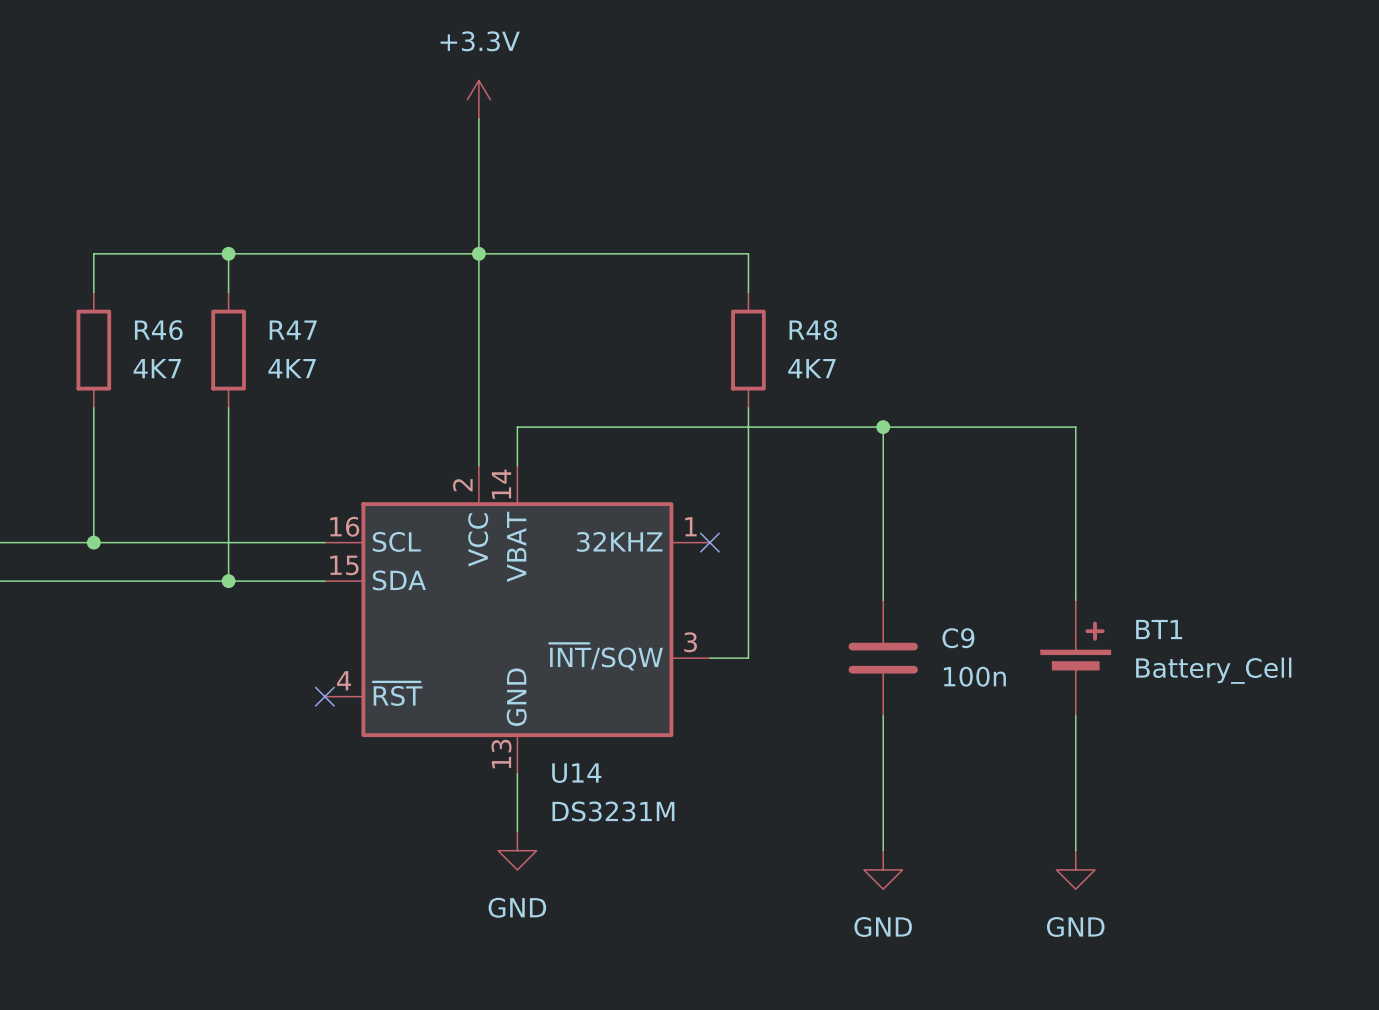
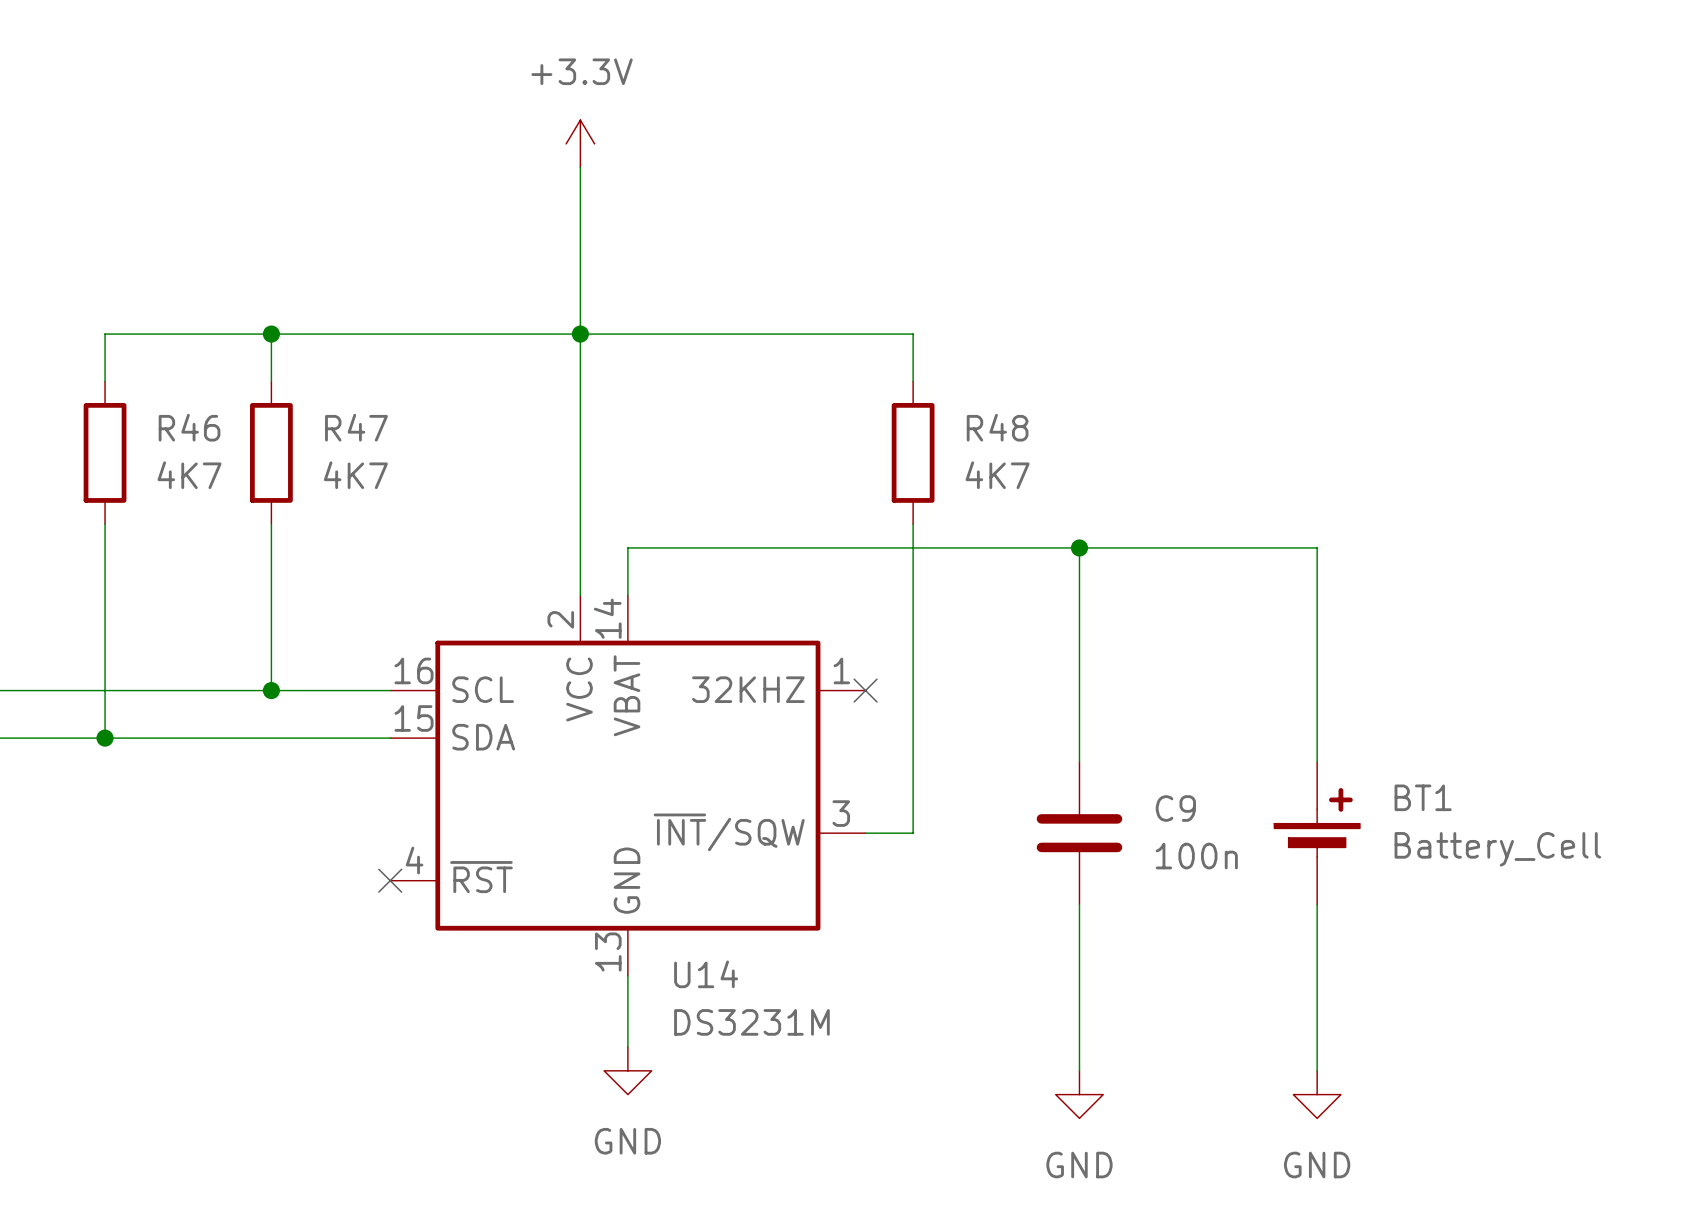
junction position: (93, 542) -> (105, 738)
wire: (228, 542) (228, 581) -> (105, 690) (105, 738)
junction position: (228, 581) -> (271, 690)

